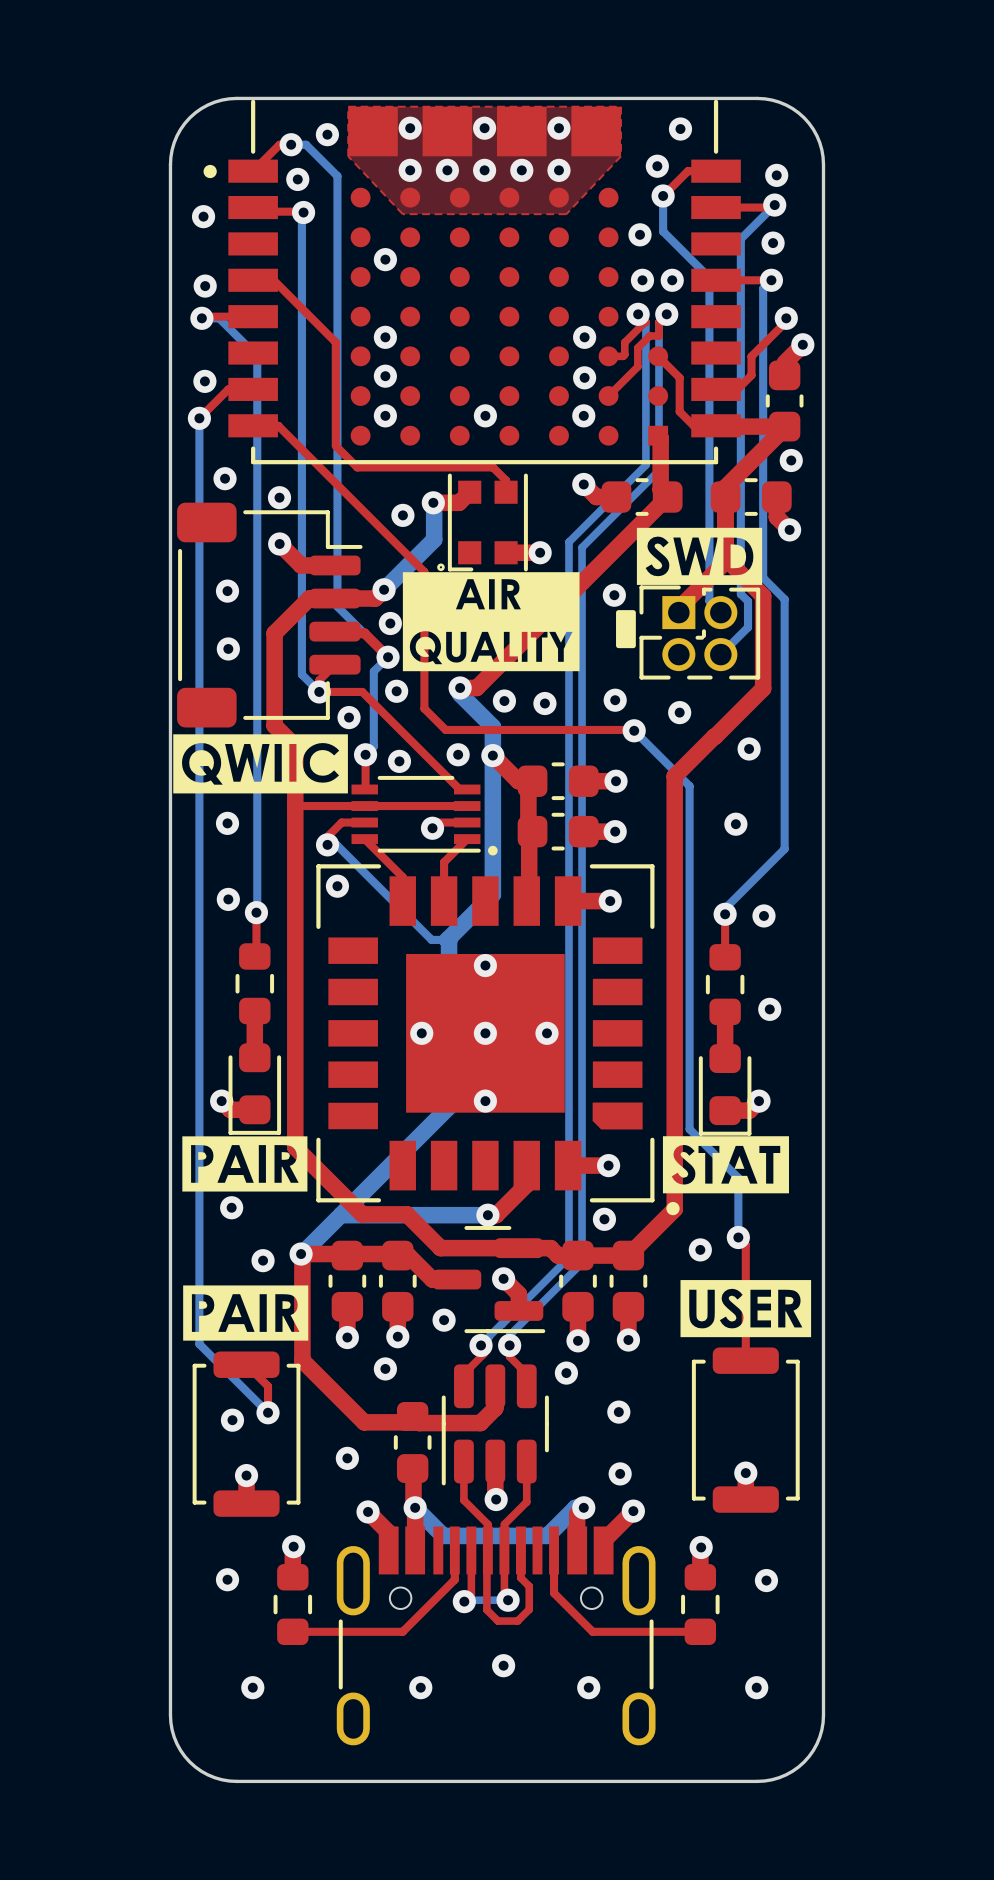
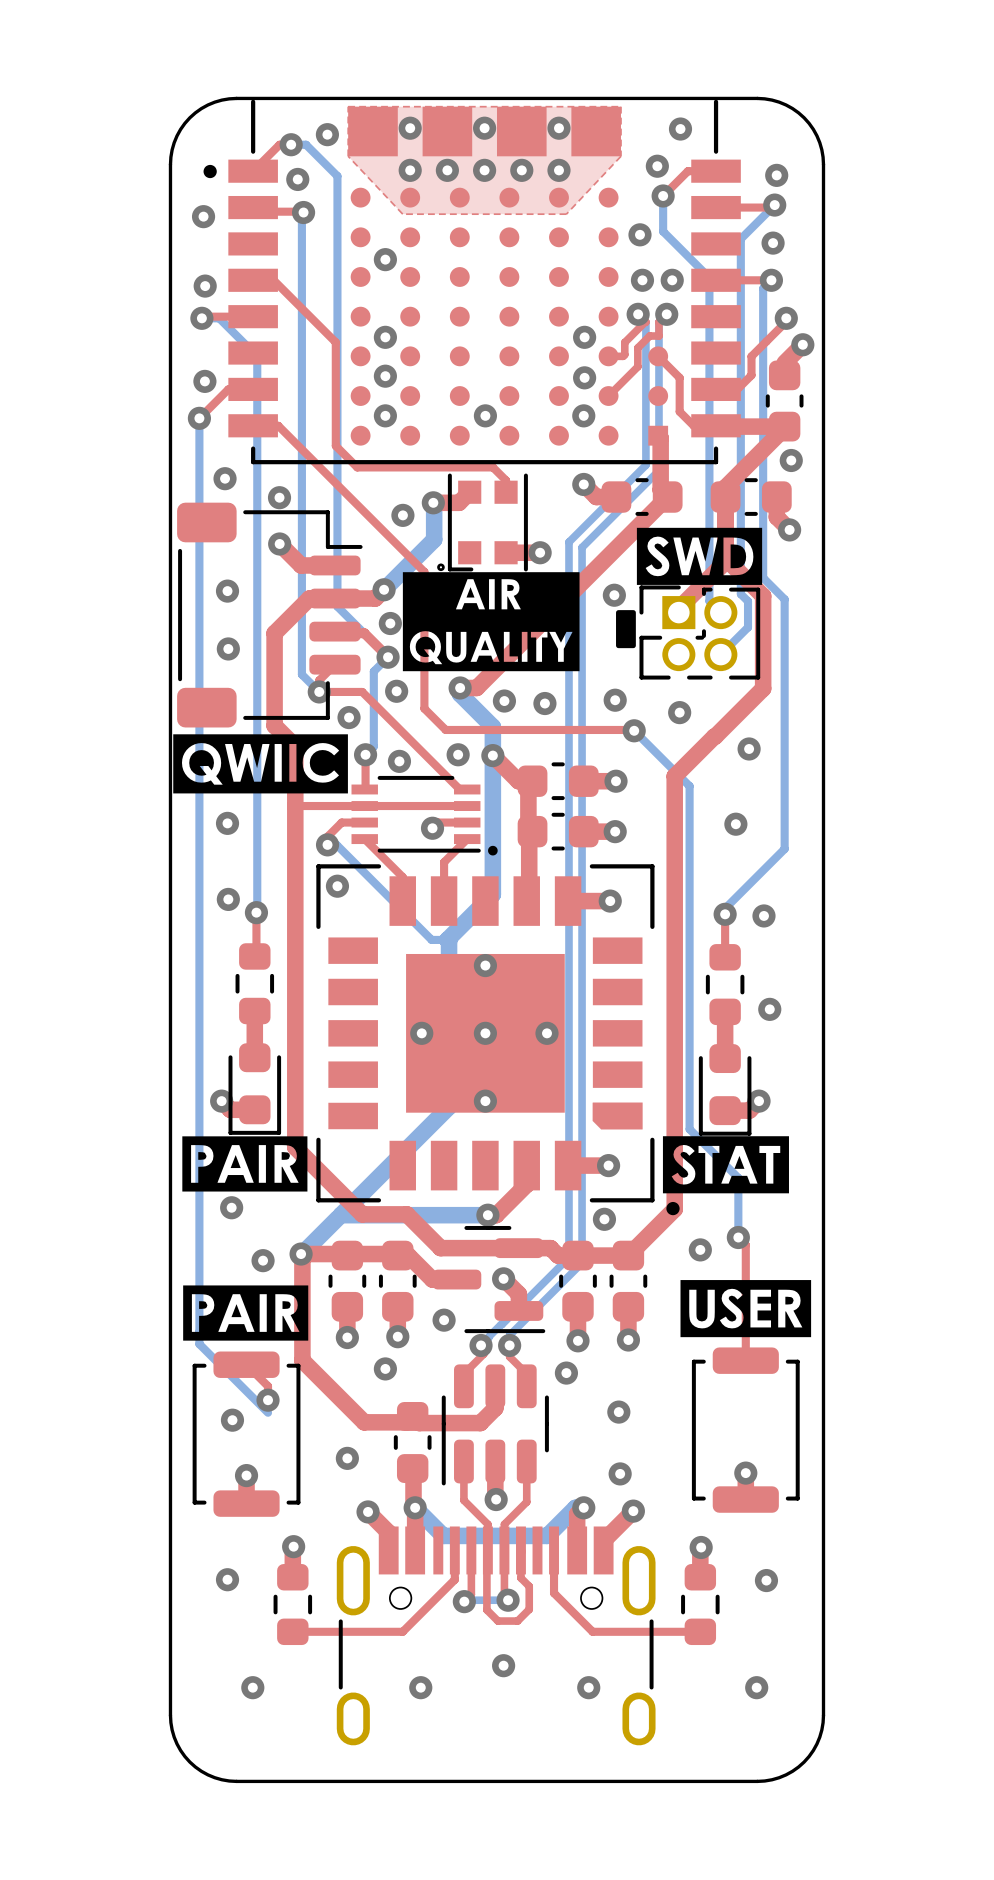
via position: (268, 1412) -> (268, 1400)

